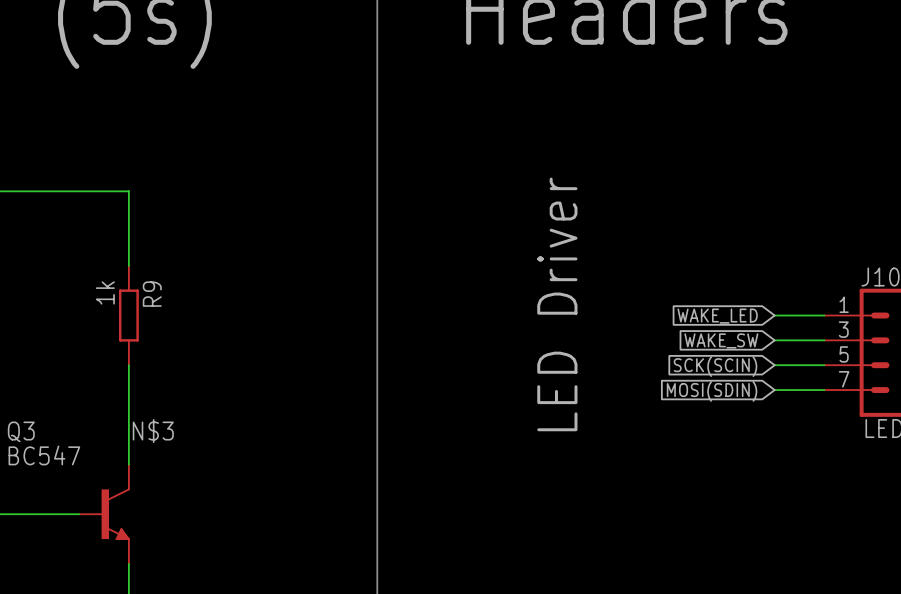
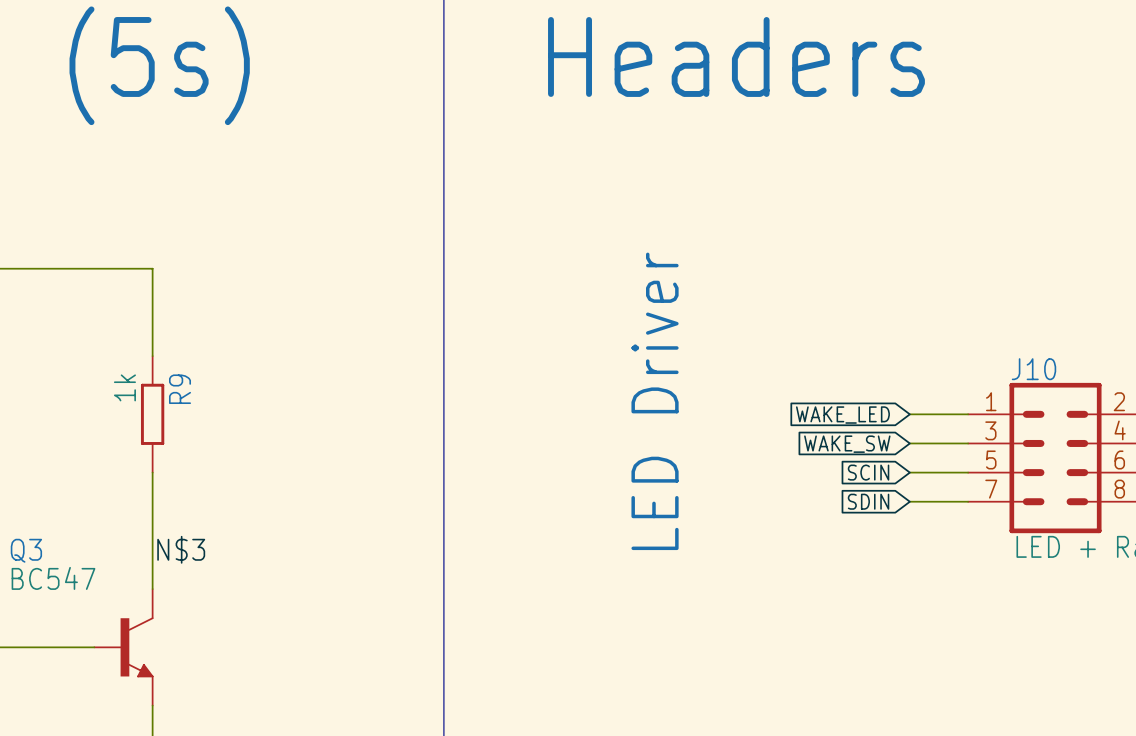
global label: SCK(SCIN) (715, 366) -> SCIN (868, 472)
global label: MOSI(SDIN) (712, 391) -> SDIN (868, 501)

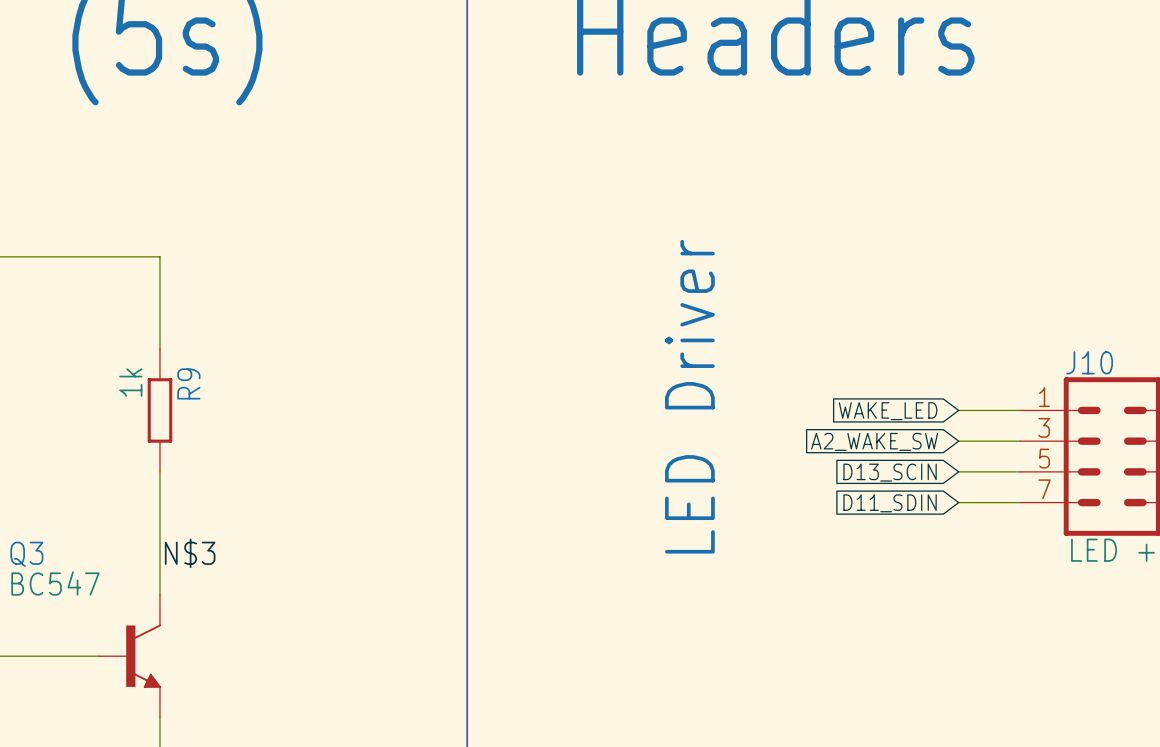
global label: WAKE_SW (847, 444) -> A2_WAKE_SW (874, 441)
global label: SCIN (868, 472) -> D13_SCIN (890, 472)
global label: SDIN (868, 501) -> D11_SDIN (890, 503)

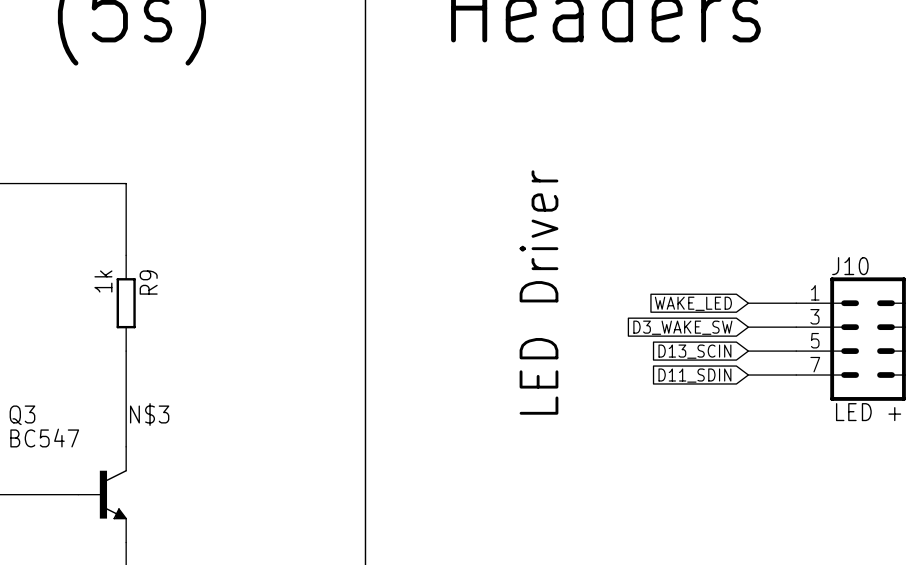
global label: A2_WAKE_SW (874, 441) -> D3_WAKE_SW (682, 327)

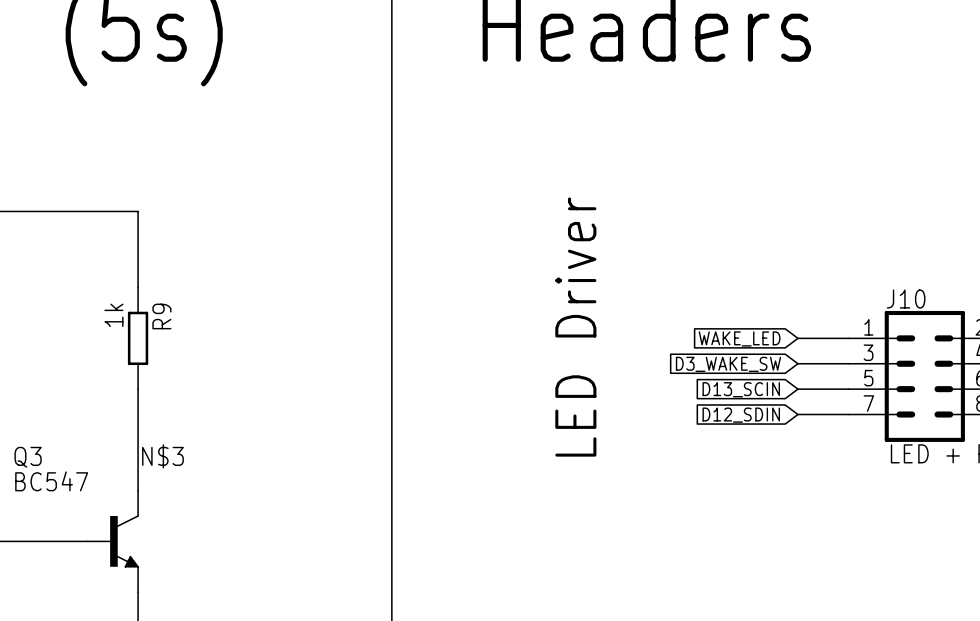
global label: D11_SDIN (694, 375) -> D12_SDIN (741, 415)

